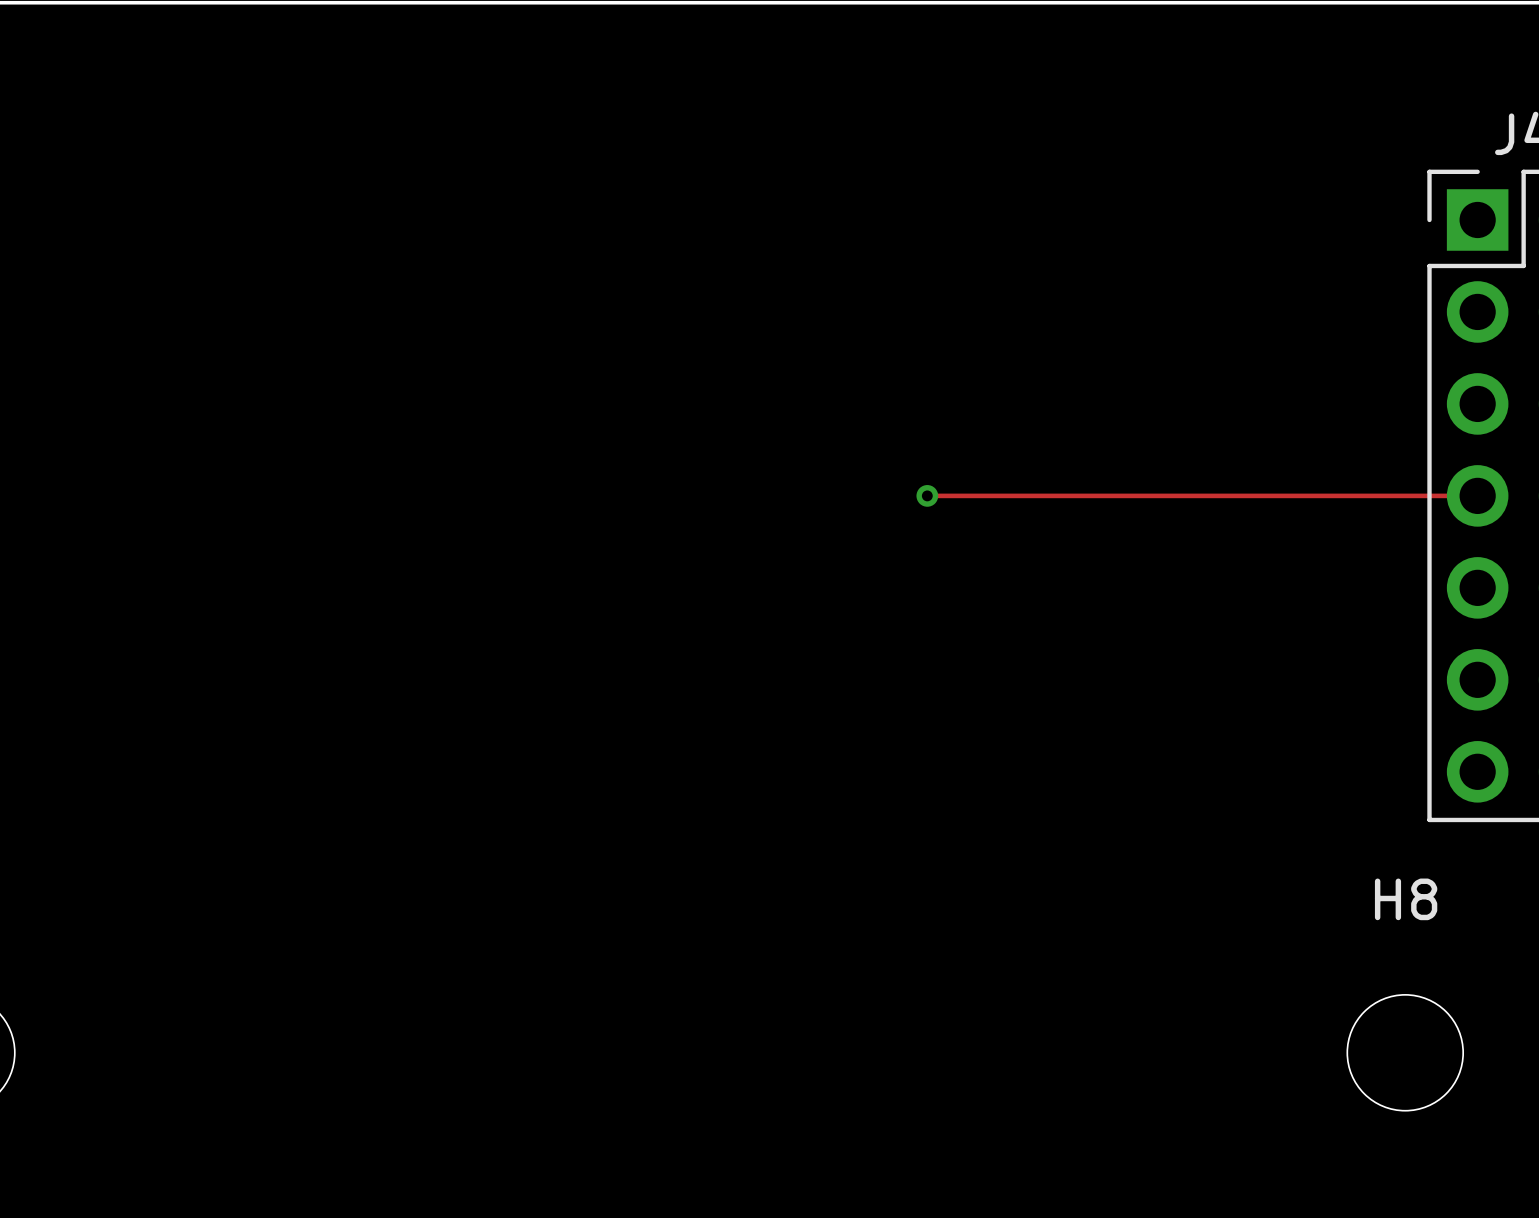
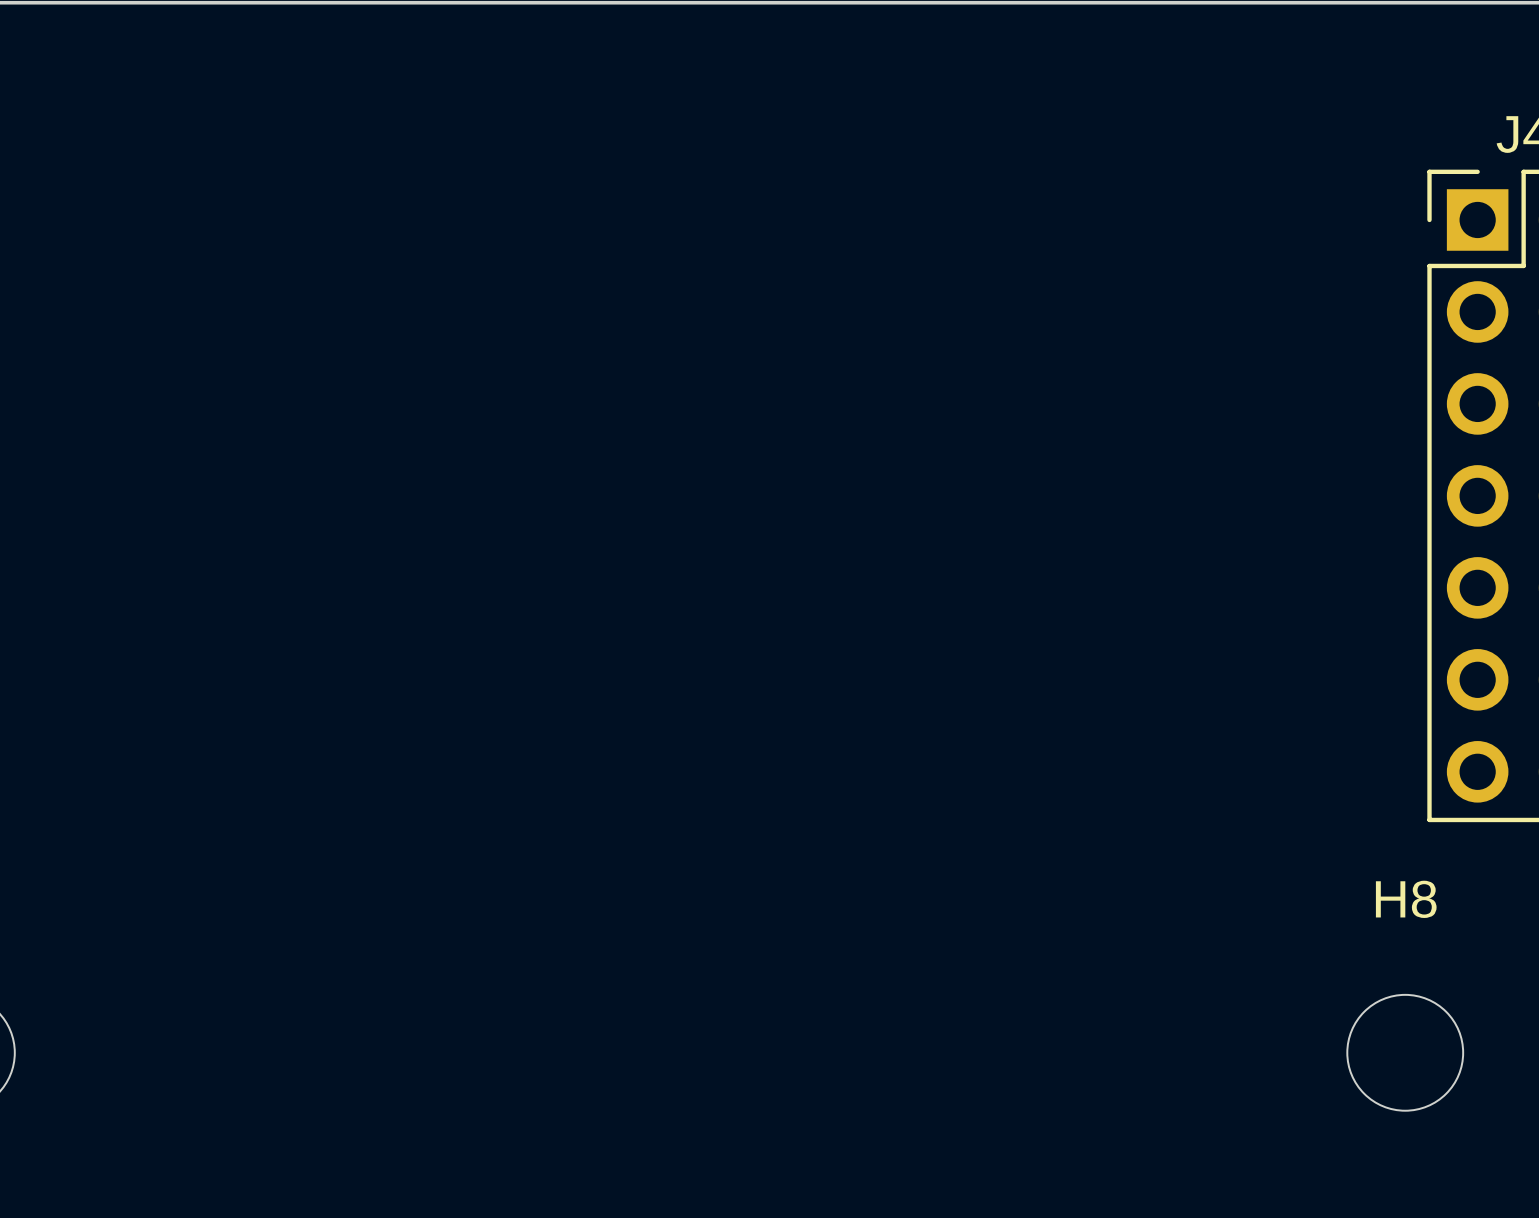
track: (927, 495) (1477, 495) -> none
via: (927, 495) -> none

